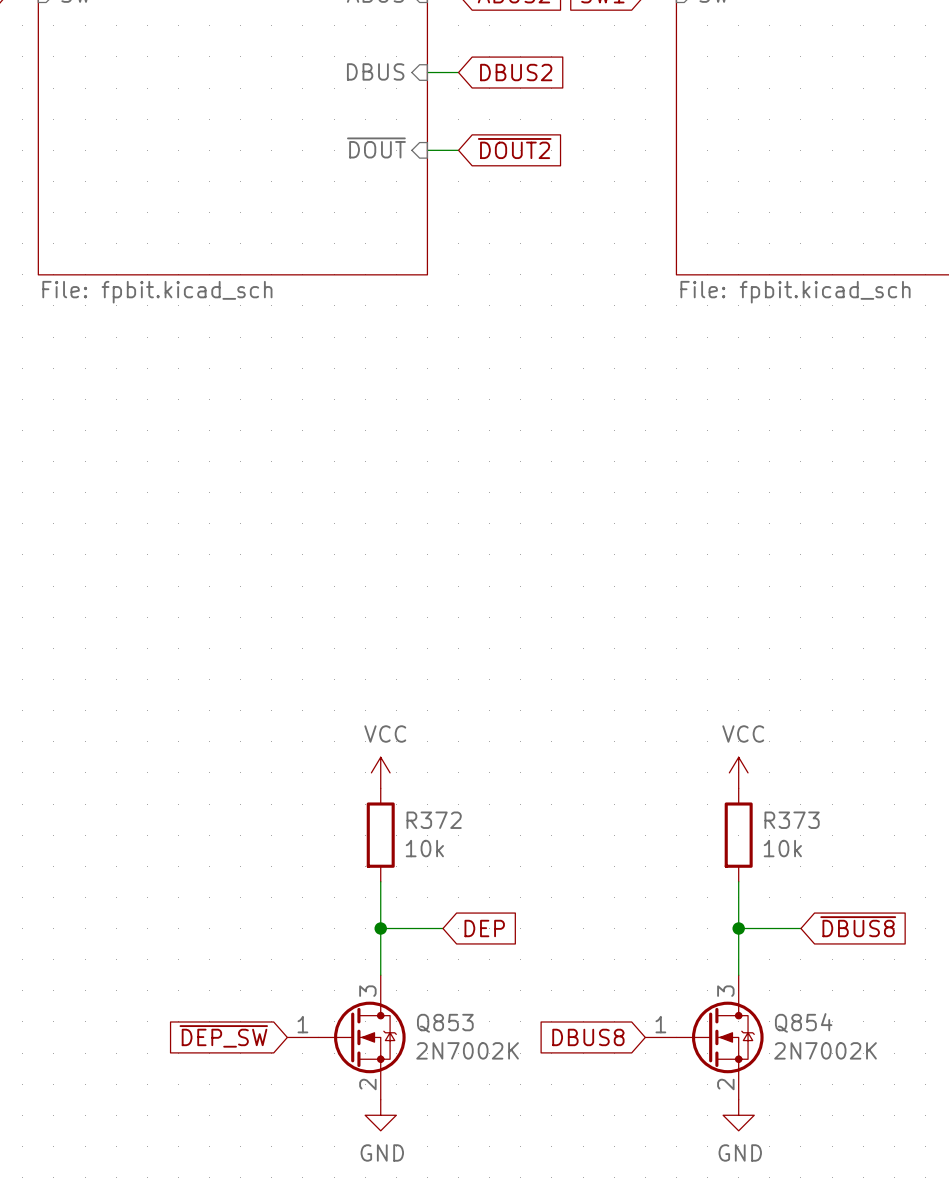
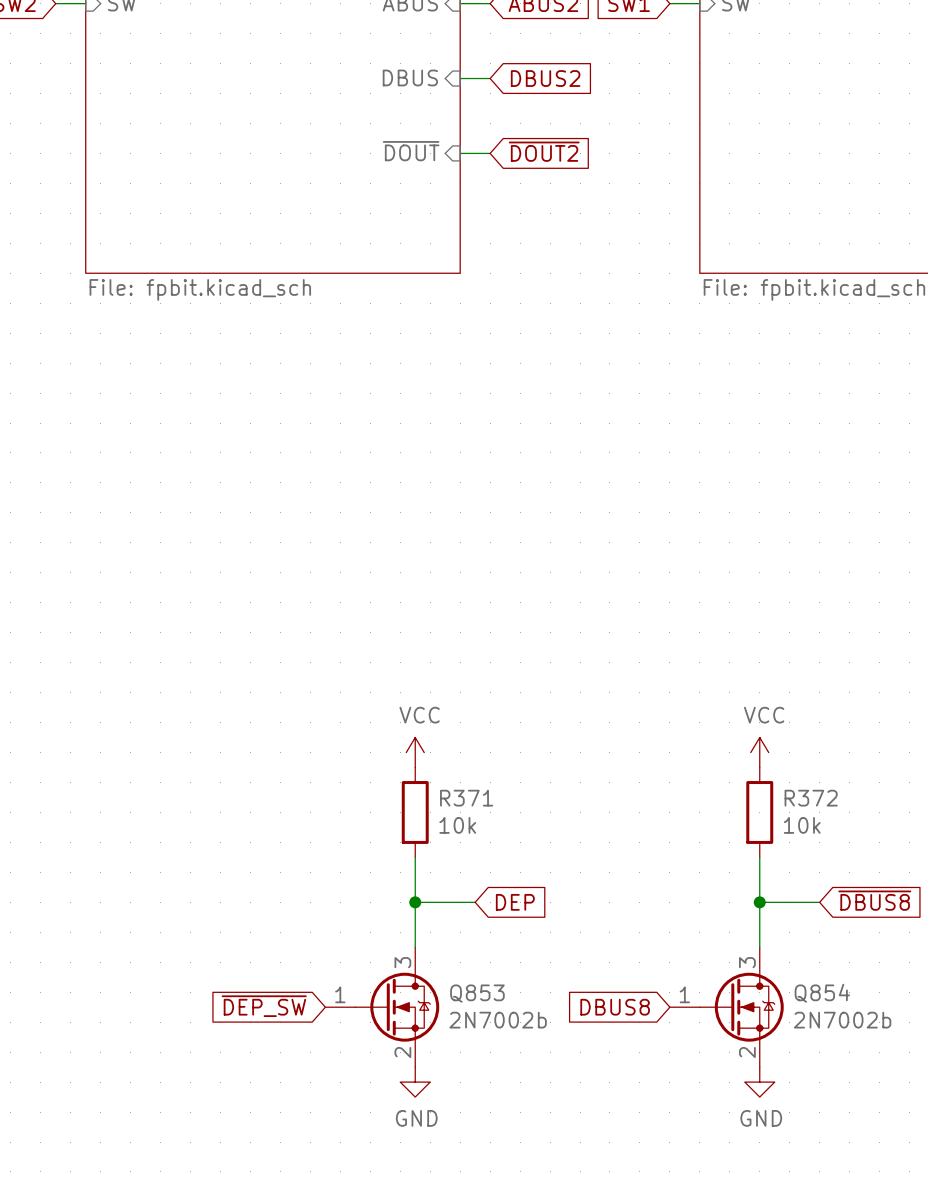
R372 name: R372 (434, 820) -> R371 (466, 798)
R373 name: R373 (792, 820) -> R372 (811, 798)
Q853 value: 2N7002K (467, 1050) -> 2N7002b (498, 1020)
Q854 value: 2N7002K (825, 1050) -> 2N7002b (842, 1020)

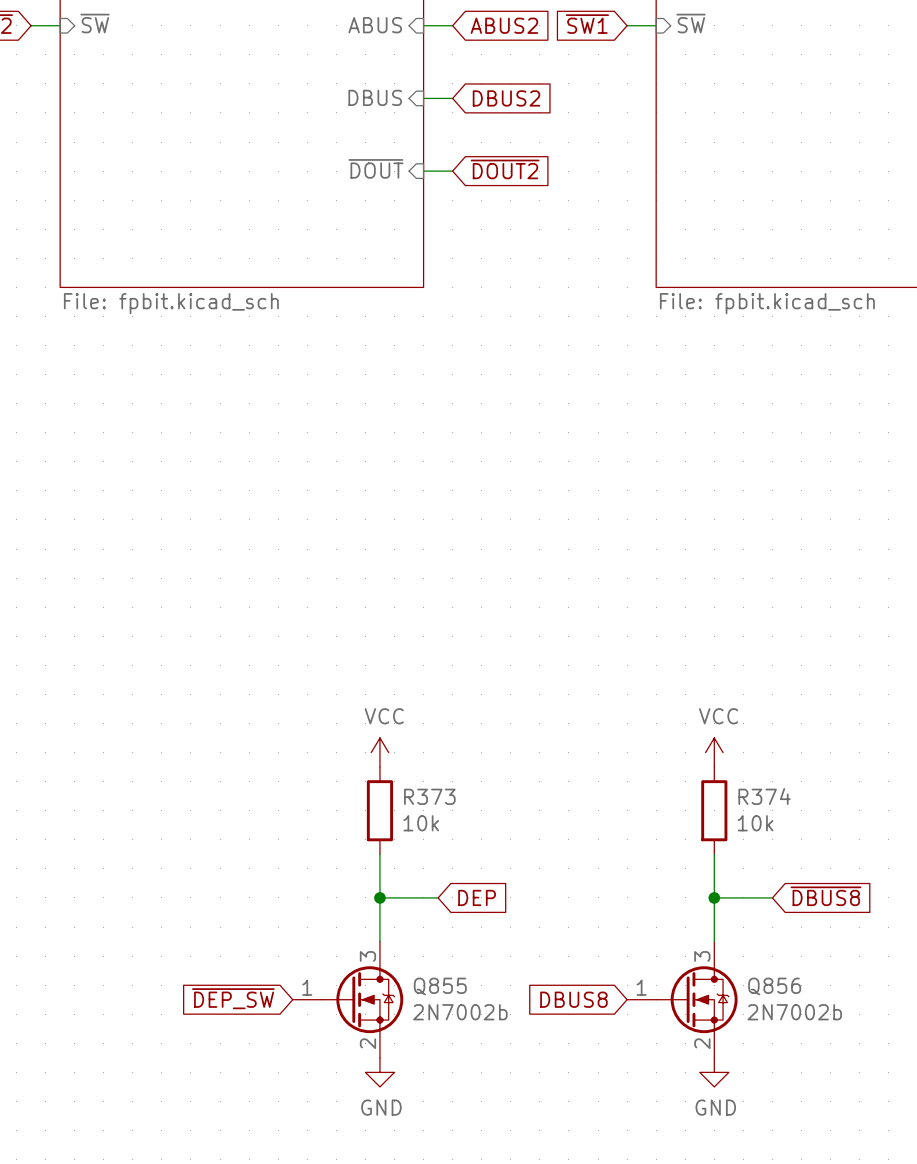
R371 name: R371 (466, 798) -> R373 (429, 796)
R372 name: R372 (811, 798) -> R374 (764, 796)
Q853 name: Q853 (477, 993) -> Q855 (440, 986)
Q854 name: Q854 (822, 993) -> Q856 (774, 986)

